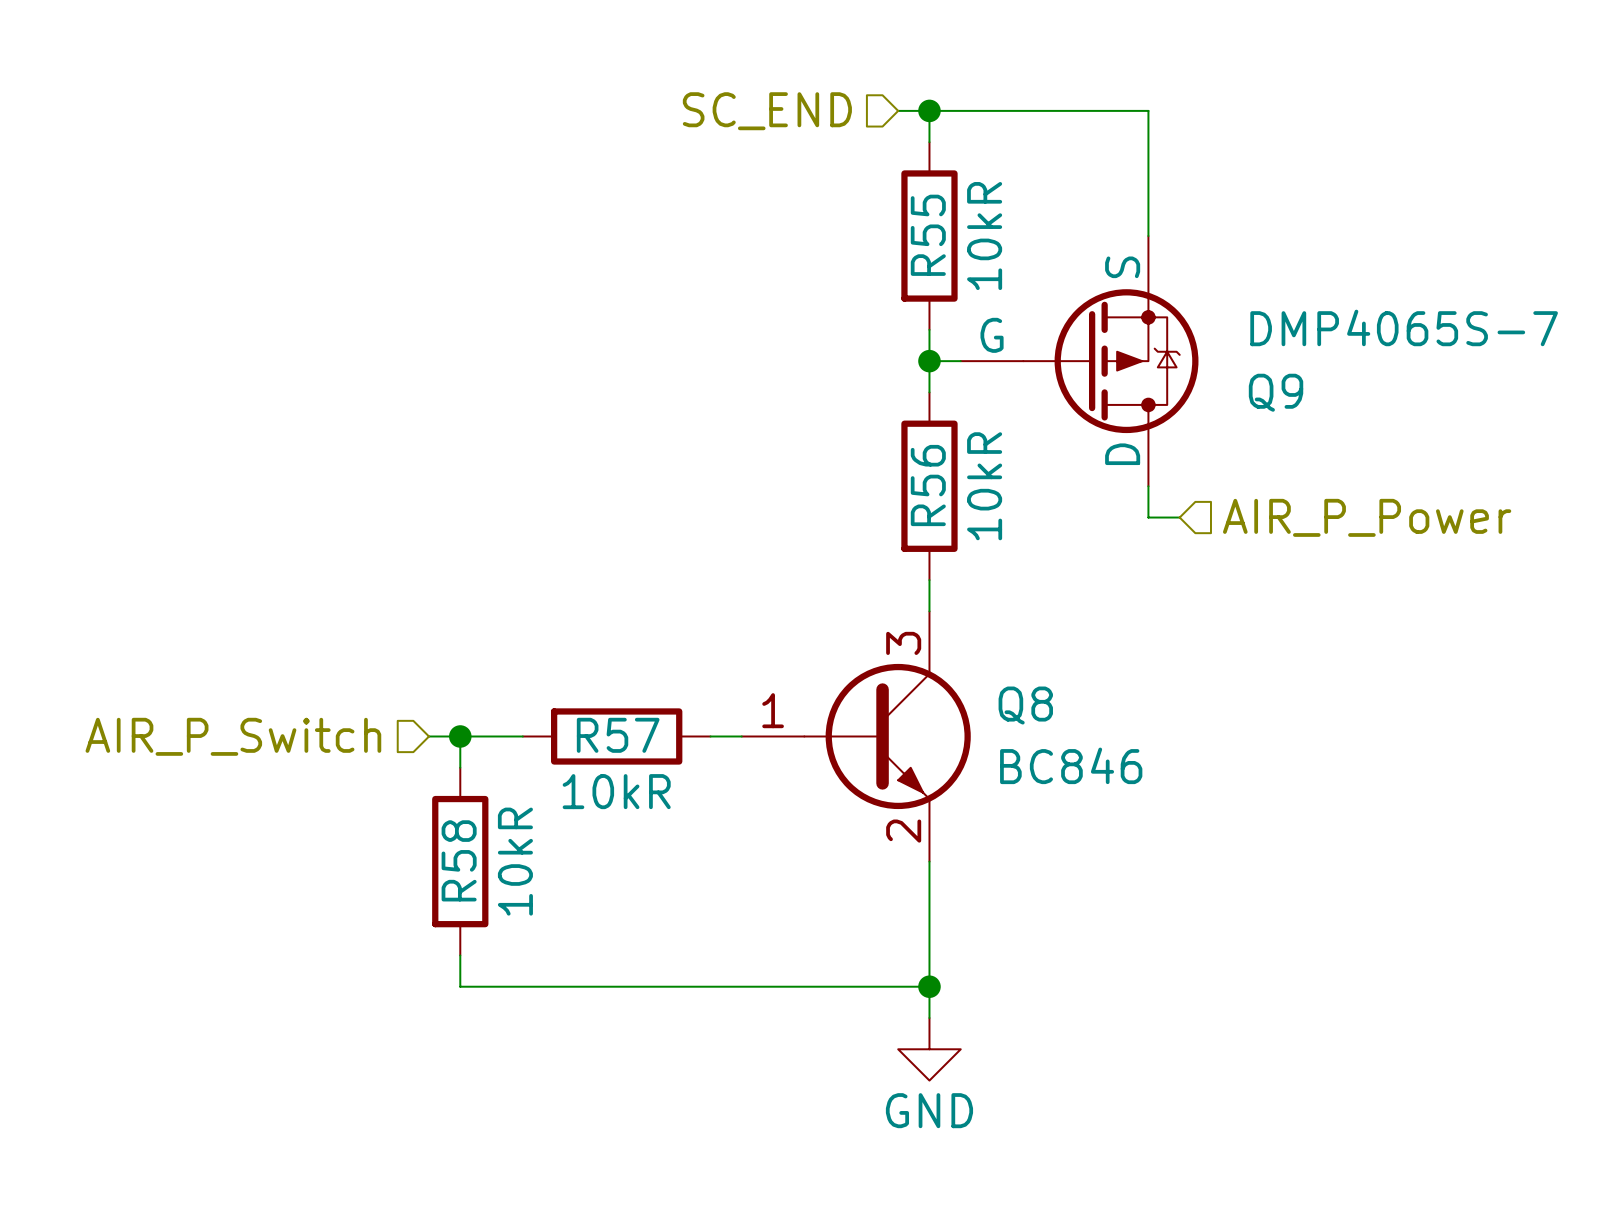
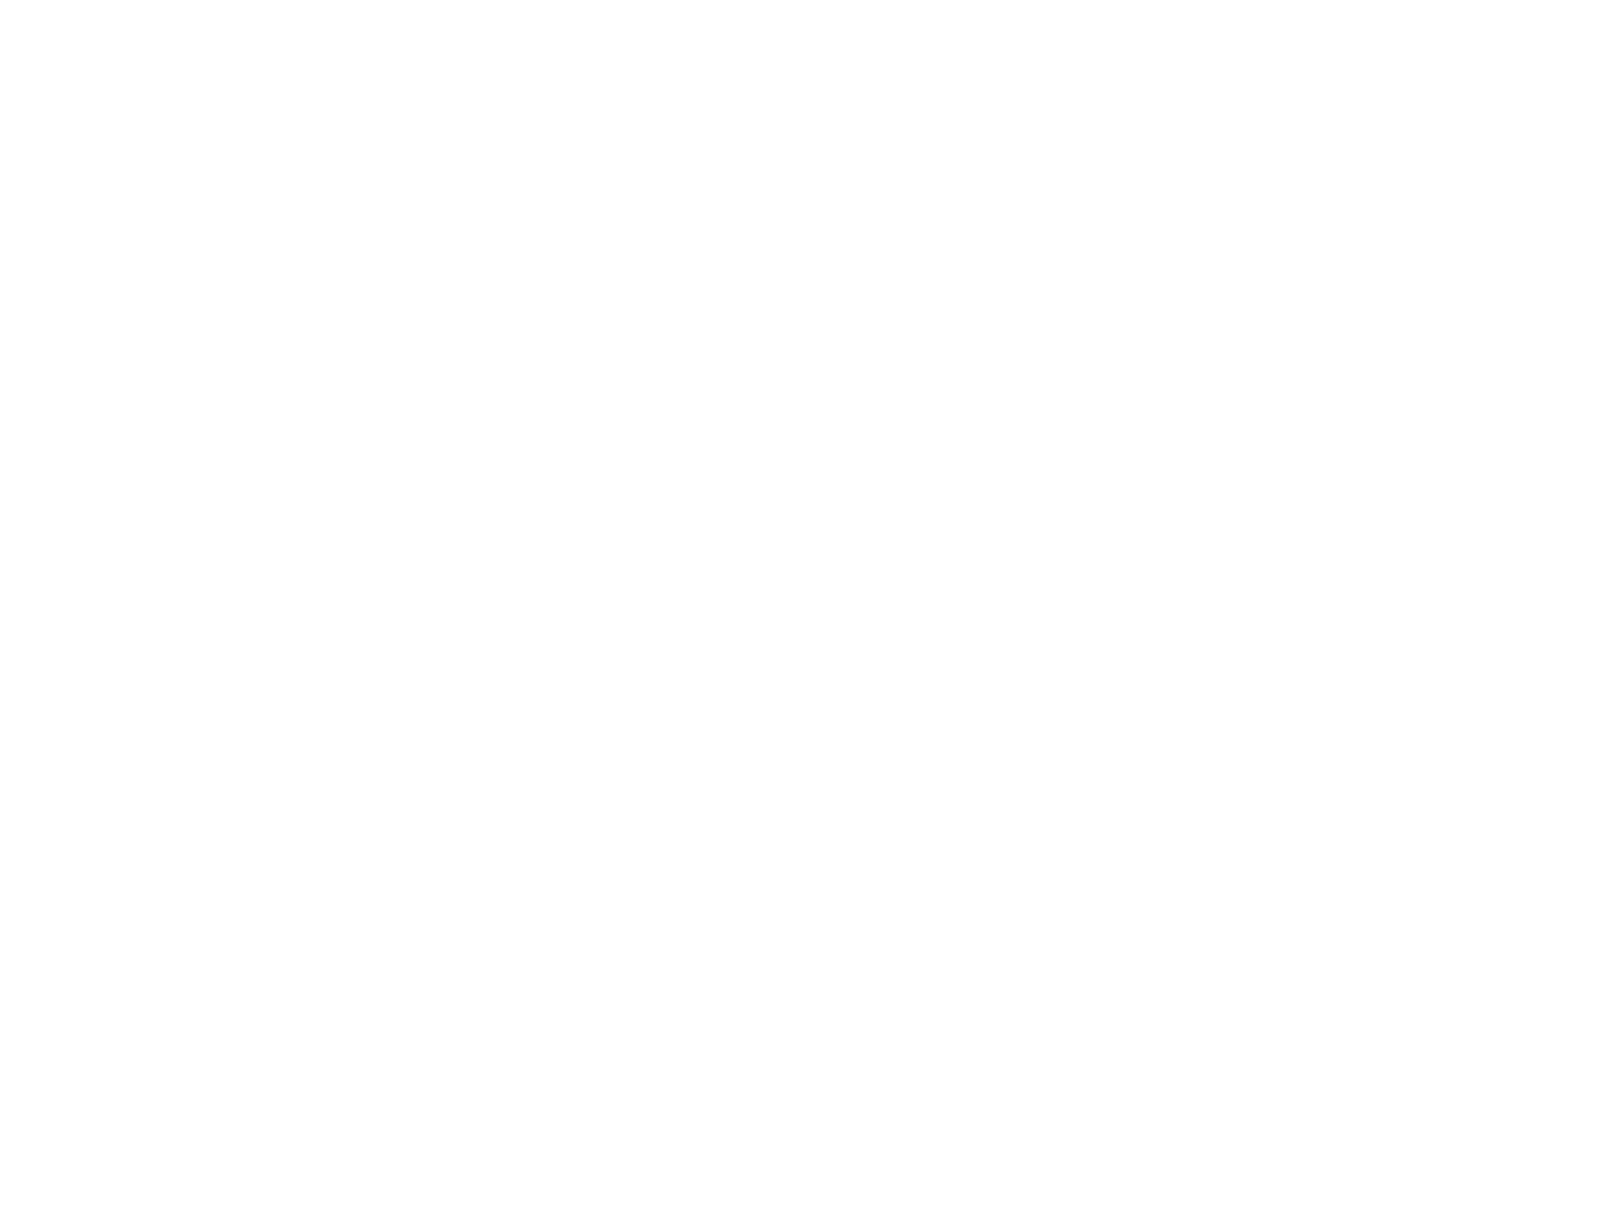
wire: (898, 110) (1148, 110) (1148, 236) -> none
wire: (929, 110) (929, 142) -> none
junction: (929, 110) -> none
hierarchical label: SC_END (767, 111) -> none
R55: 10kR (929, 236) -> none
wire: (929, 329) (929, 392) -> none
wire: (929, 361) (960, 361) -> none
junction: (929, 361) -> none
Q9: DMP4065S-7 (1079, 361) -> none
R56: 10kR (929, 486) -> none
wire: (1148, 486) (1148, 517) (1179, 517) -> none
hierarchical label: AIR_P_Power (1367, 517) -> none
wire: (929, 580) (929, 611) -> none
hierarchical label: AIR_P_Switch (233, 736) -> none
wire: (429, 736) (522, 736) -> none
wire: (460, 736) (460, 767) -> none
junction: (460, 736) -> none
R57: 10kR (616, 736) -> none
wire: (710, 736) (741, 736) -> none
Q8: BC846 (856, 736) -> none
R58: 10kR (460, 861) -> none
wire: (929, 861) (929, 1018) -> none
wire: (460, 955) (460, 986) (929, 986) -> none
junction: (929, 986) -> none
power symbol: GND (929, 1049) -> none

